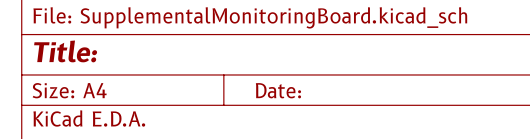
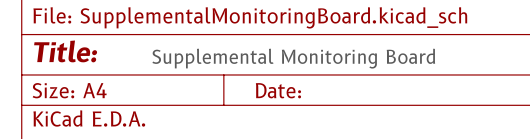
text: none -> Supplemental Monitoring Board (293, 58)

